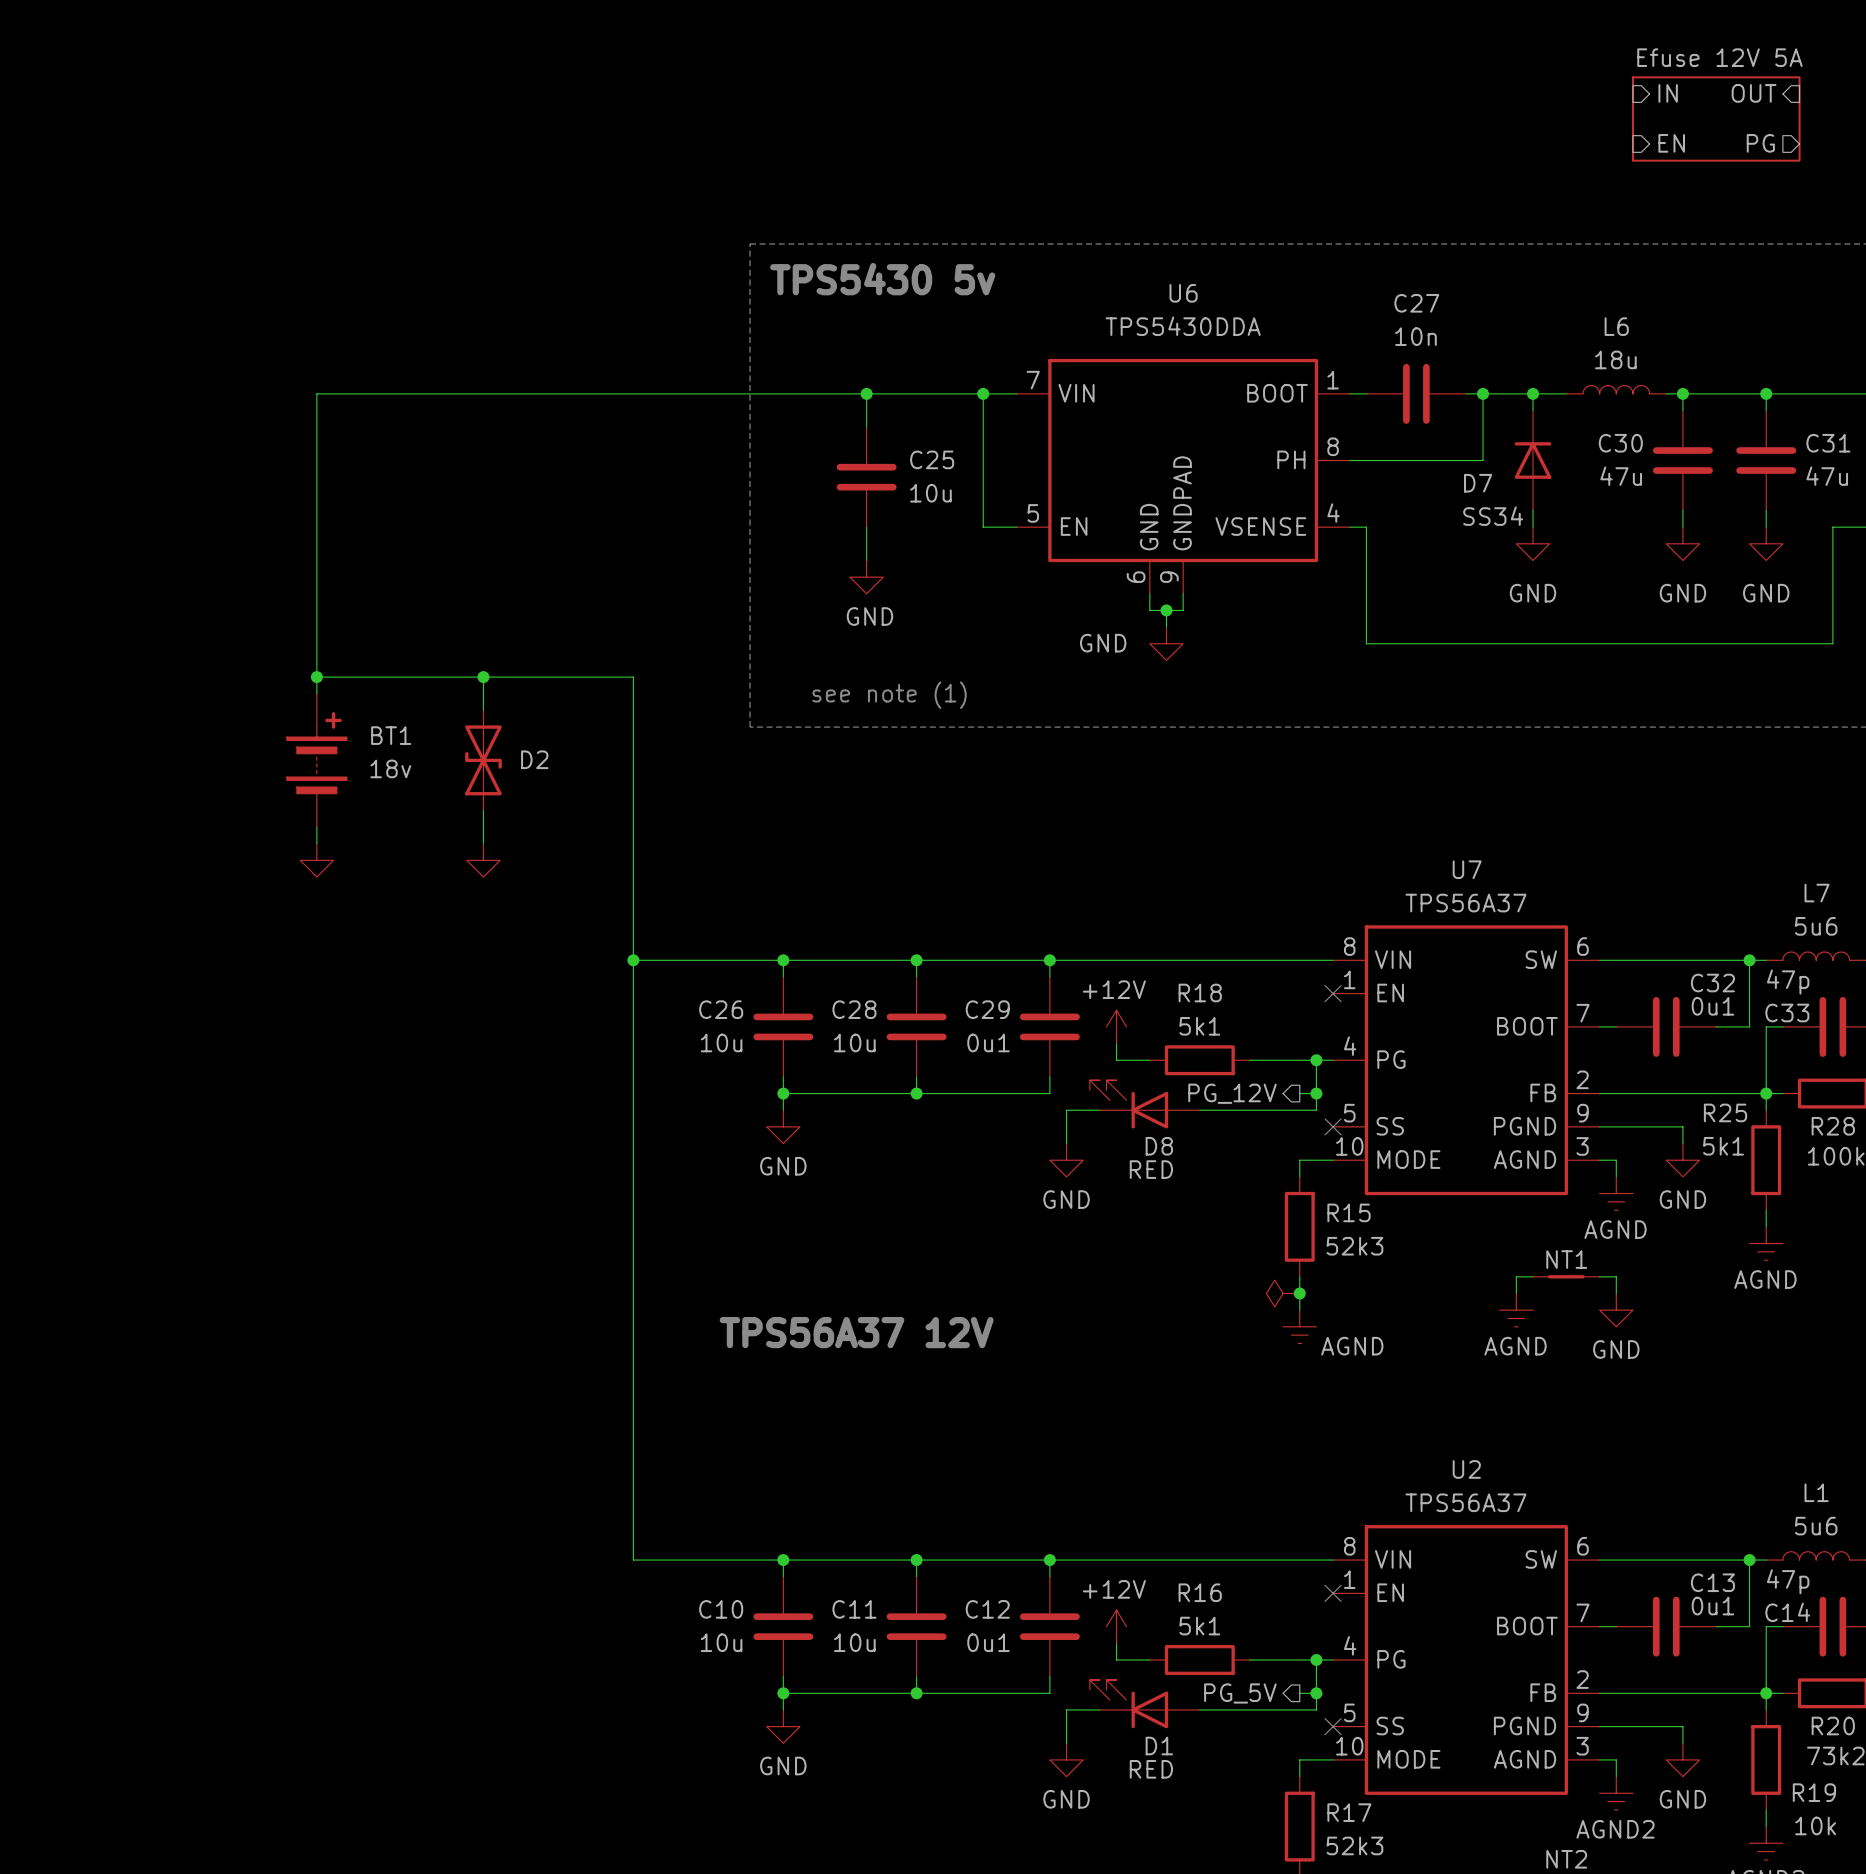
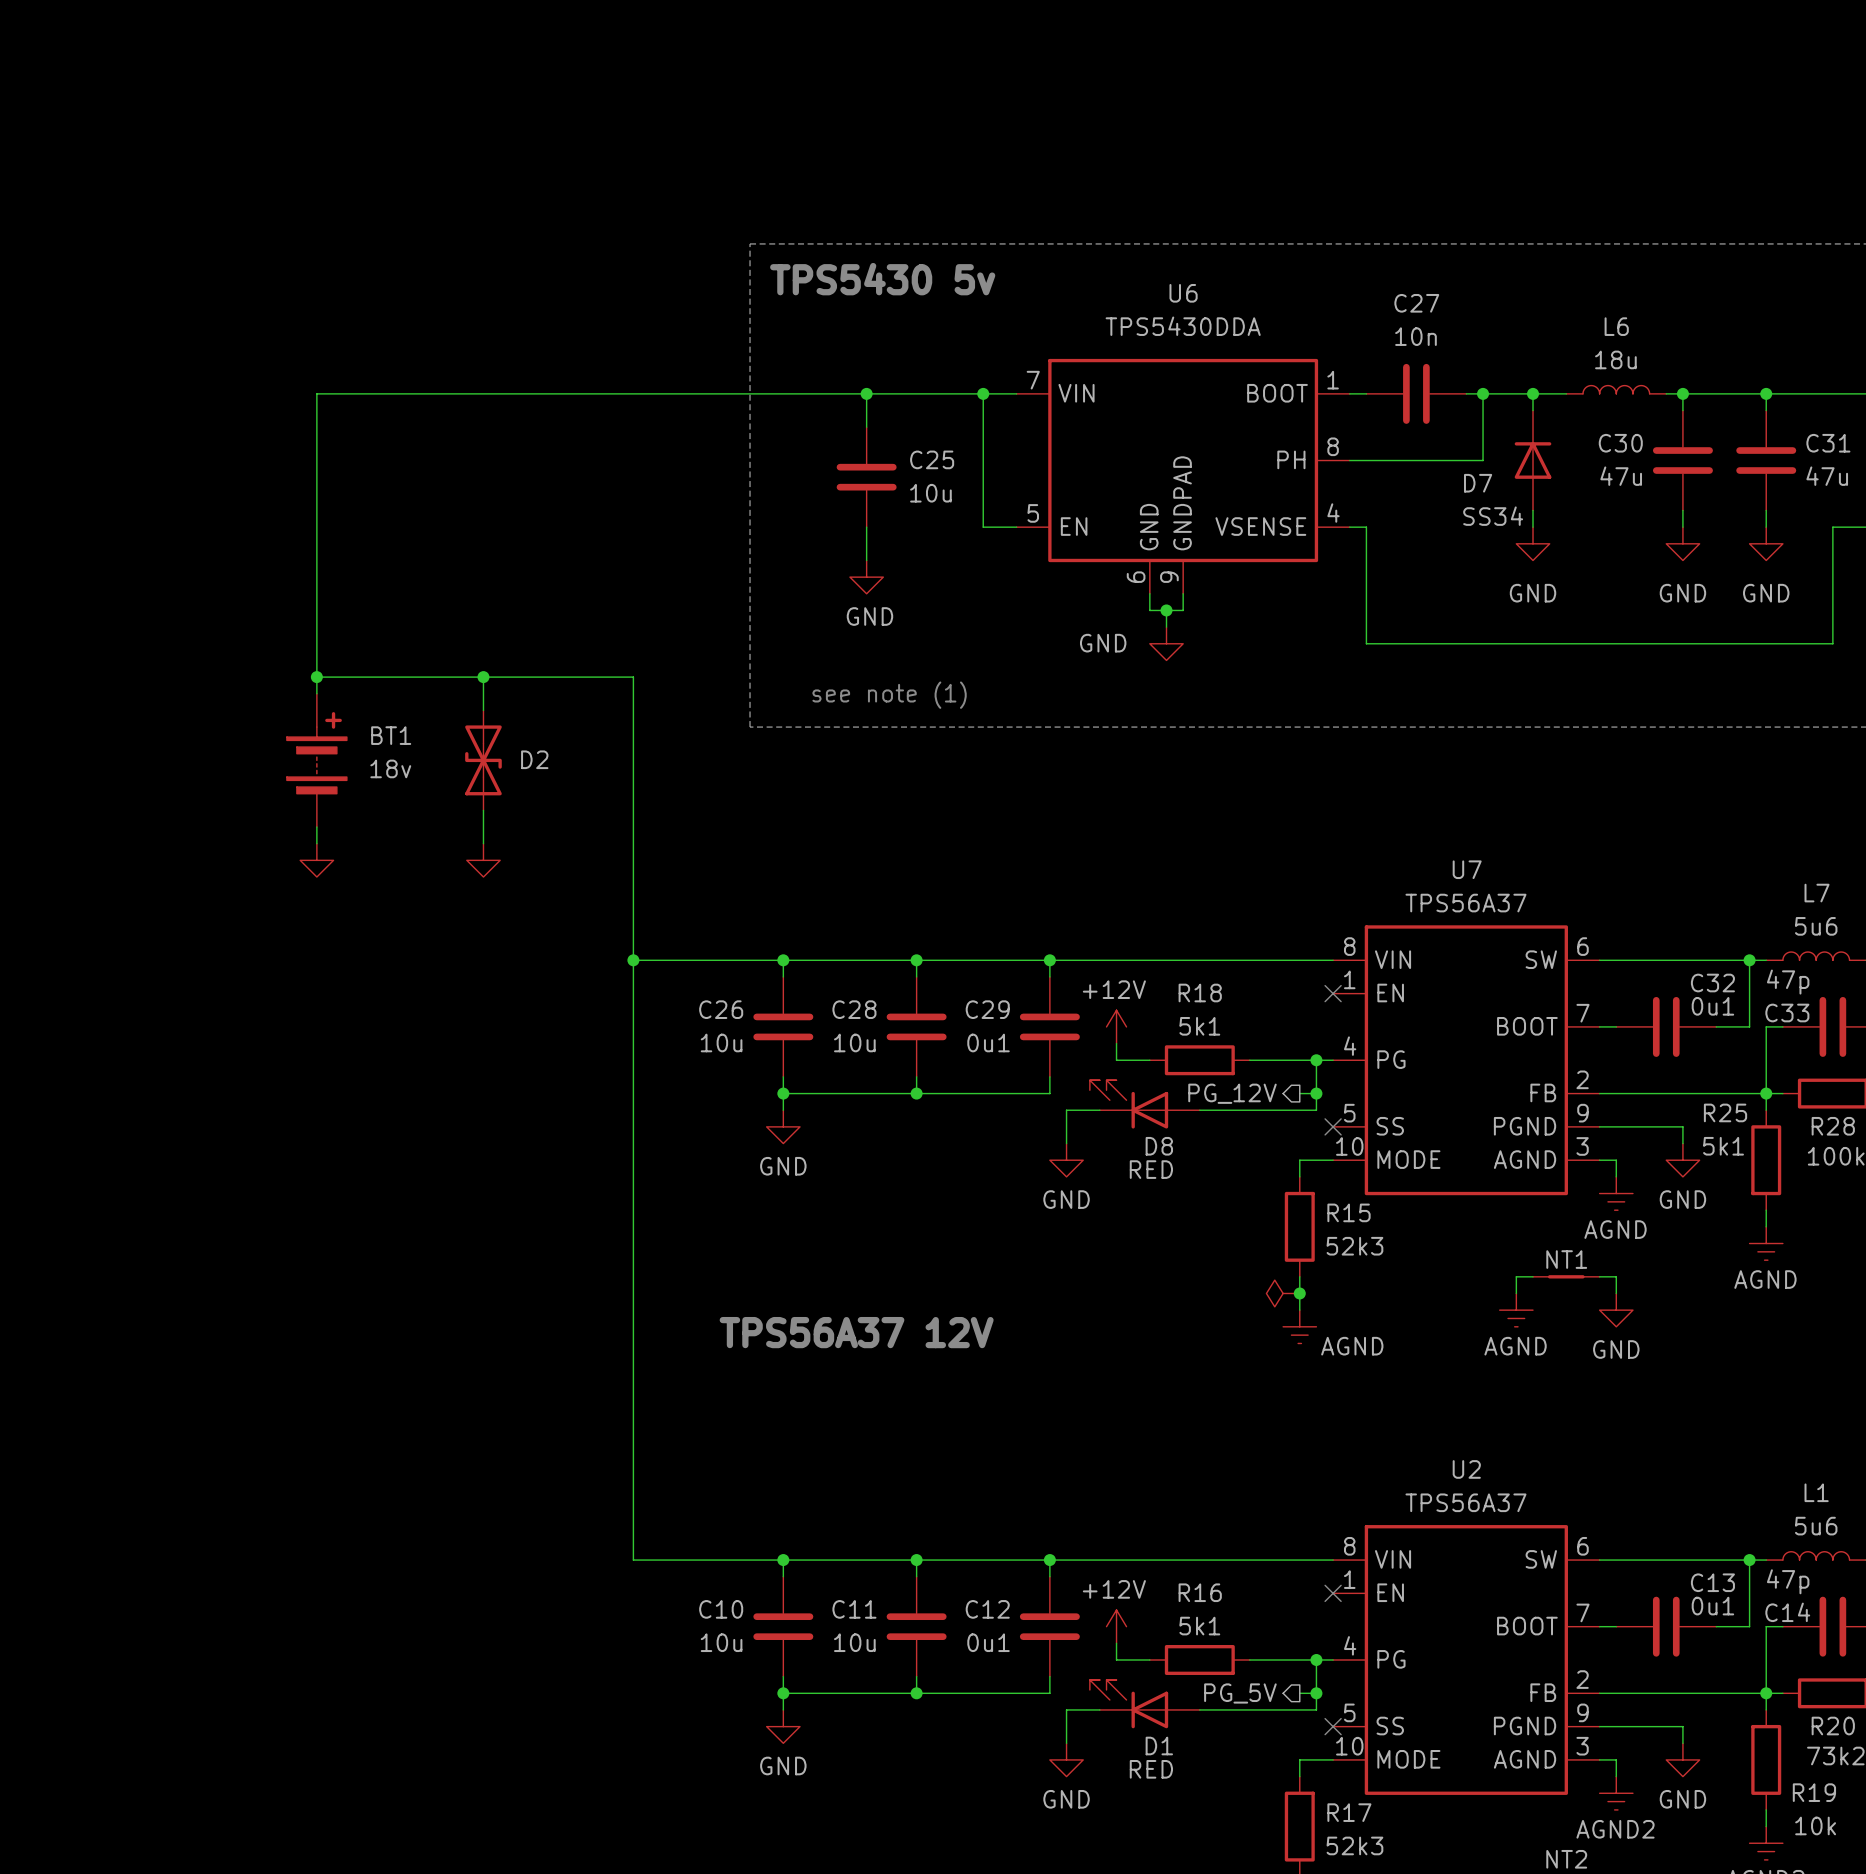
sheet pin: IN (1668, 93) -> none
sheet pin: OUT (1754, 93) -> none
sheet Efuse 12V 5A: (1716, 119) -> none
sheet pin: EN (1671, 143) -> none
sheet pin: PG (1760, 143) -> none

